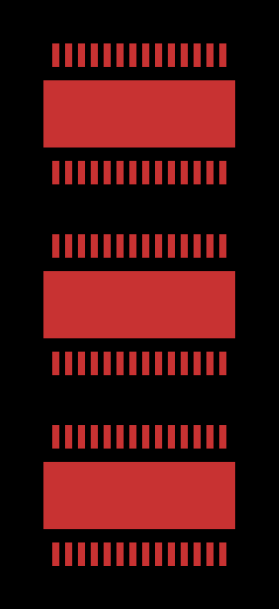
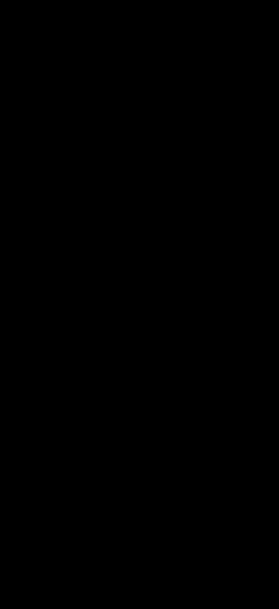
part: (139, 113) -> none
part: (139, 304) -> none
part: (139, 495) -> none

